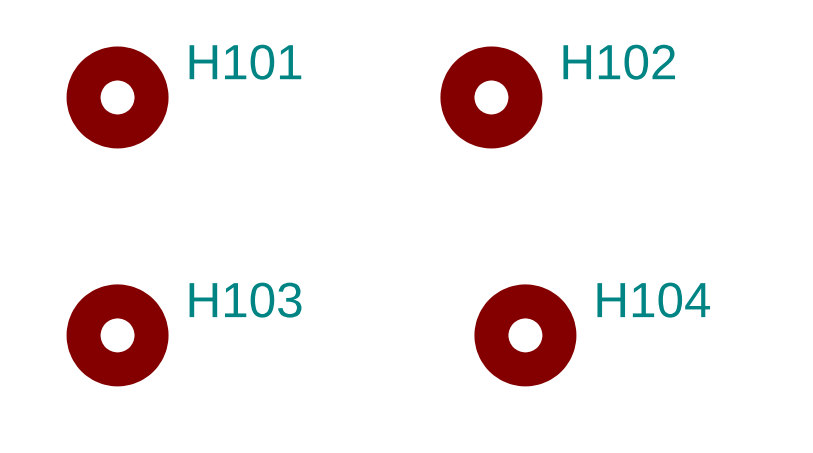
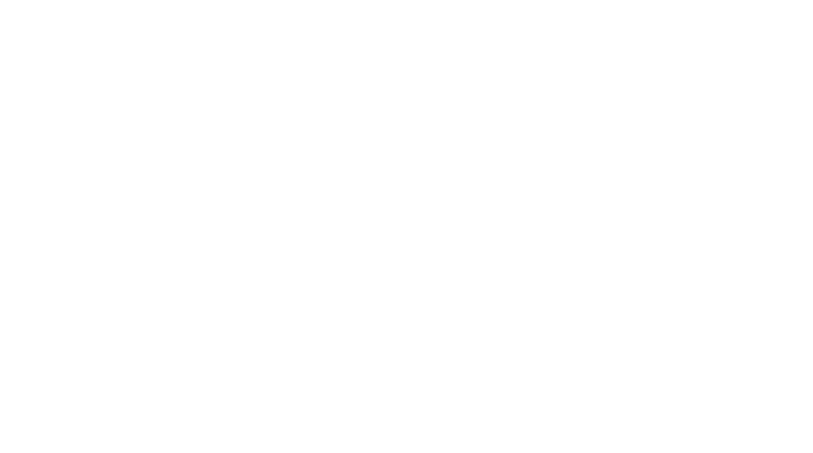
H101: (117, 97) -> none
H102: (491, 97) -> none
H103: (117, 335) -> none
H104: (525, 335) -> none

